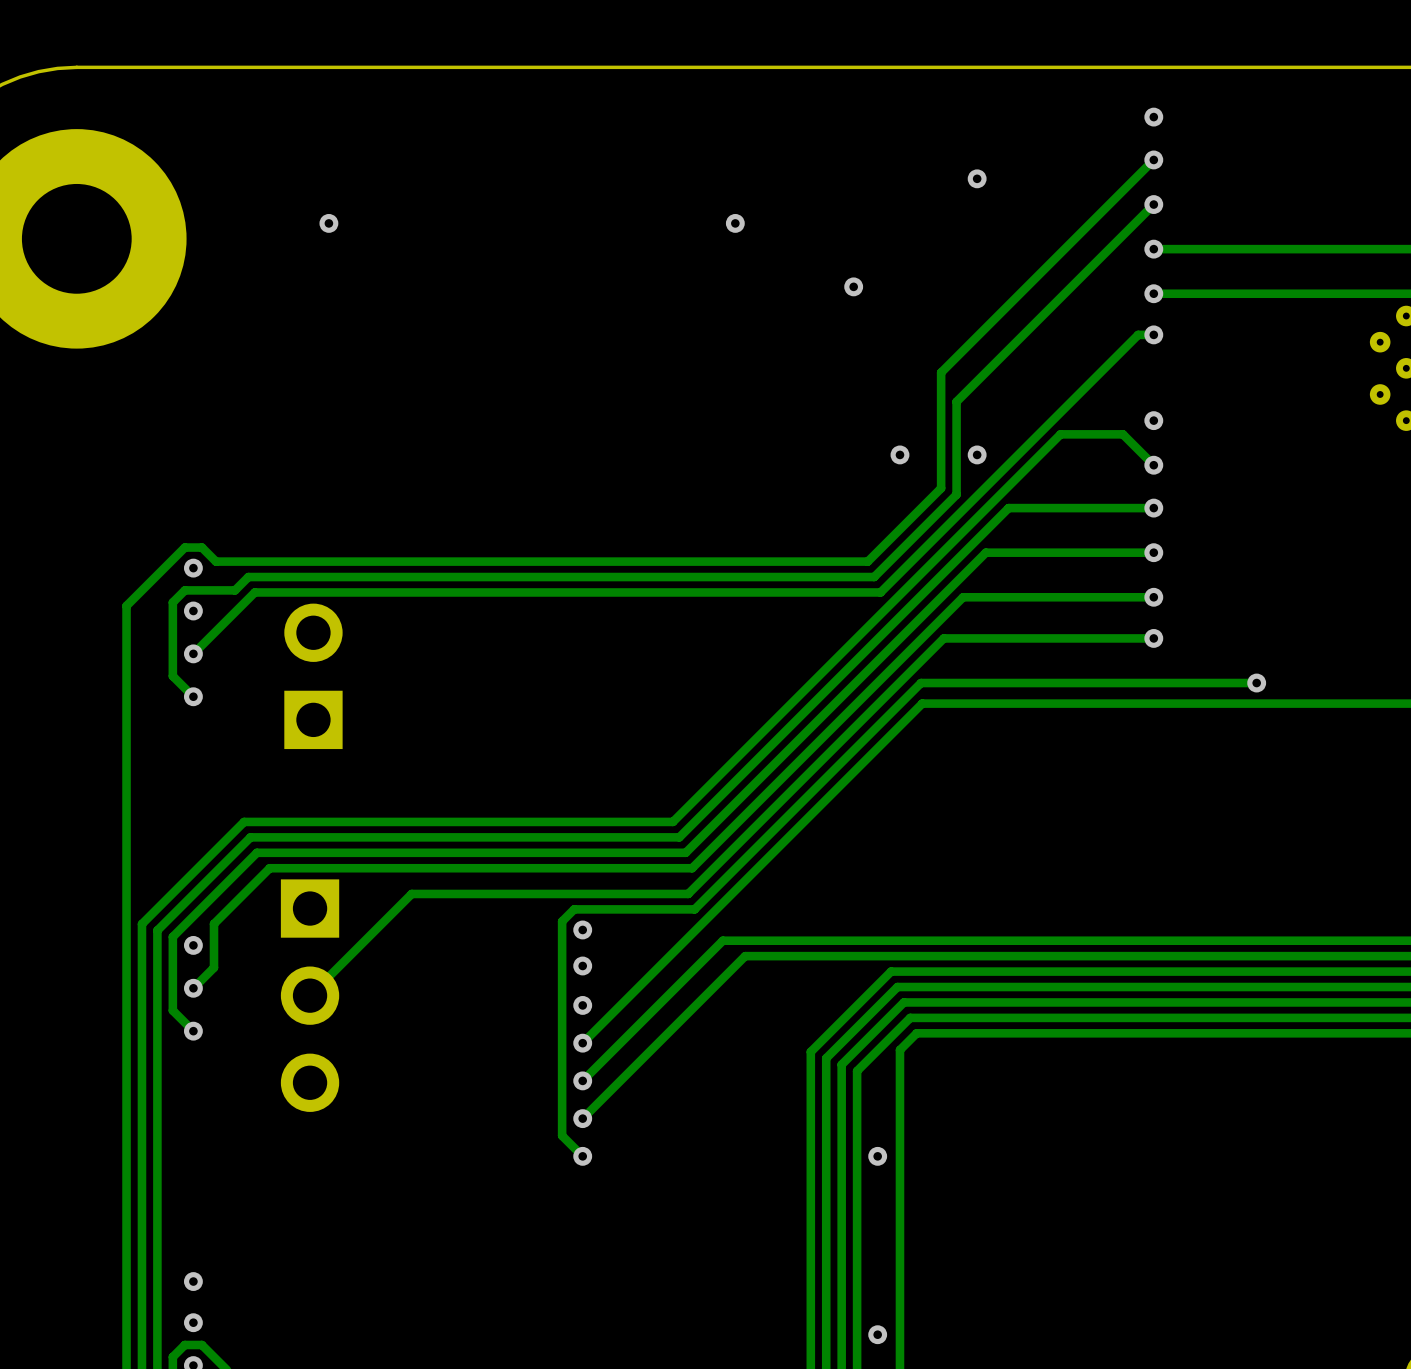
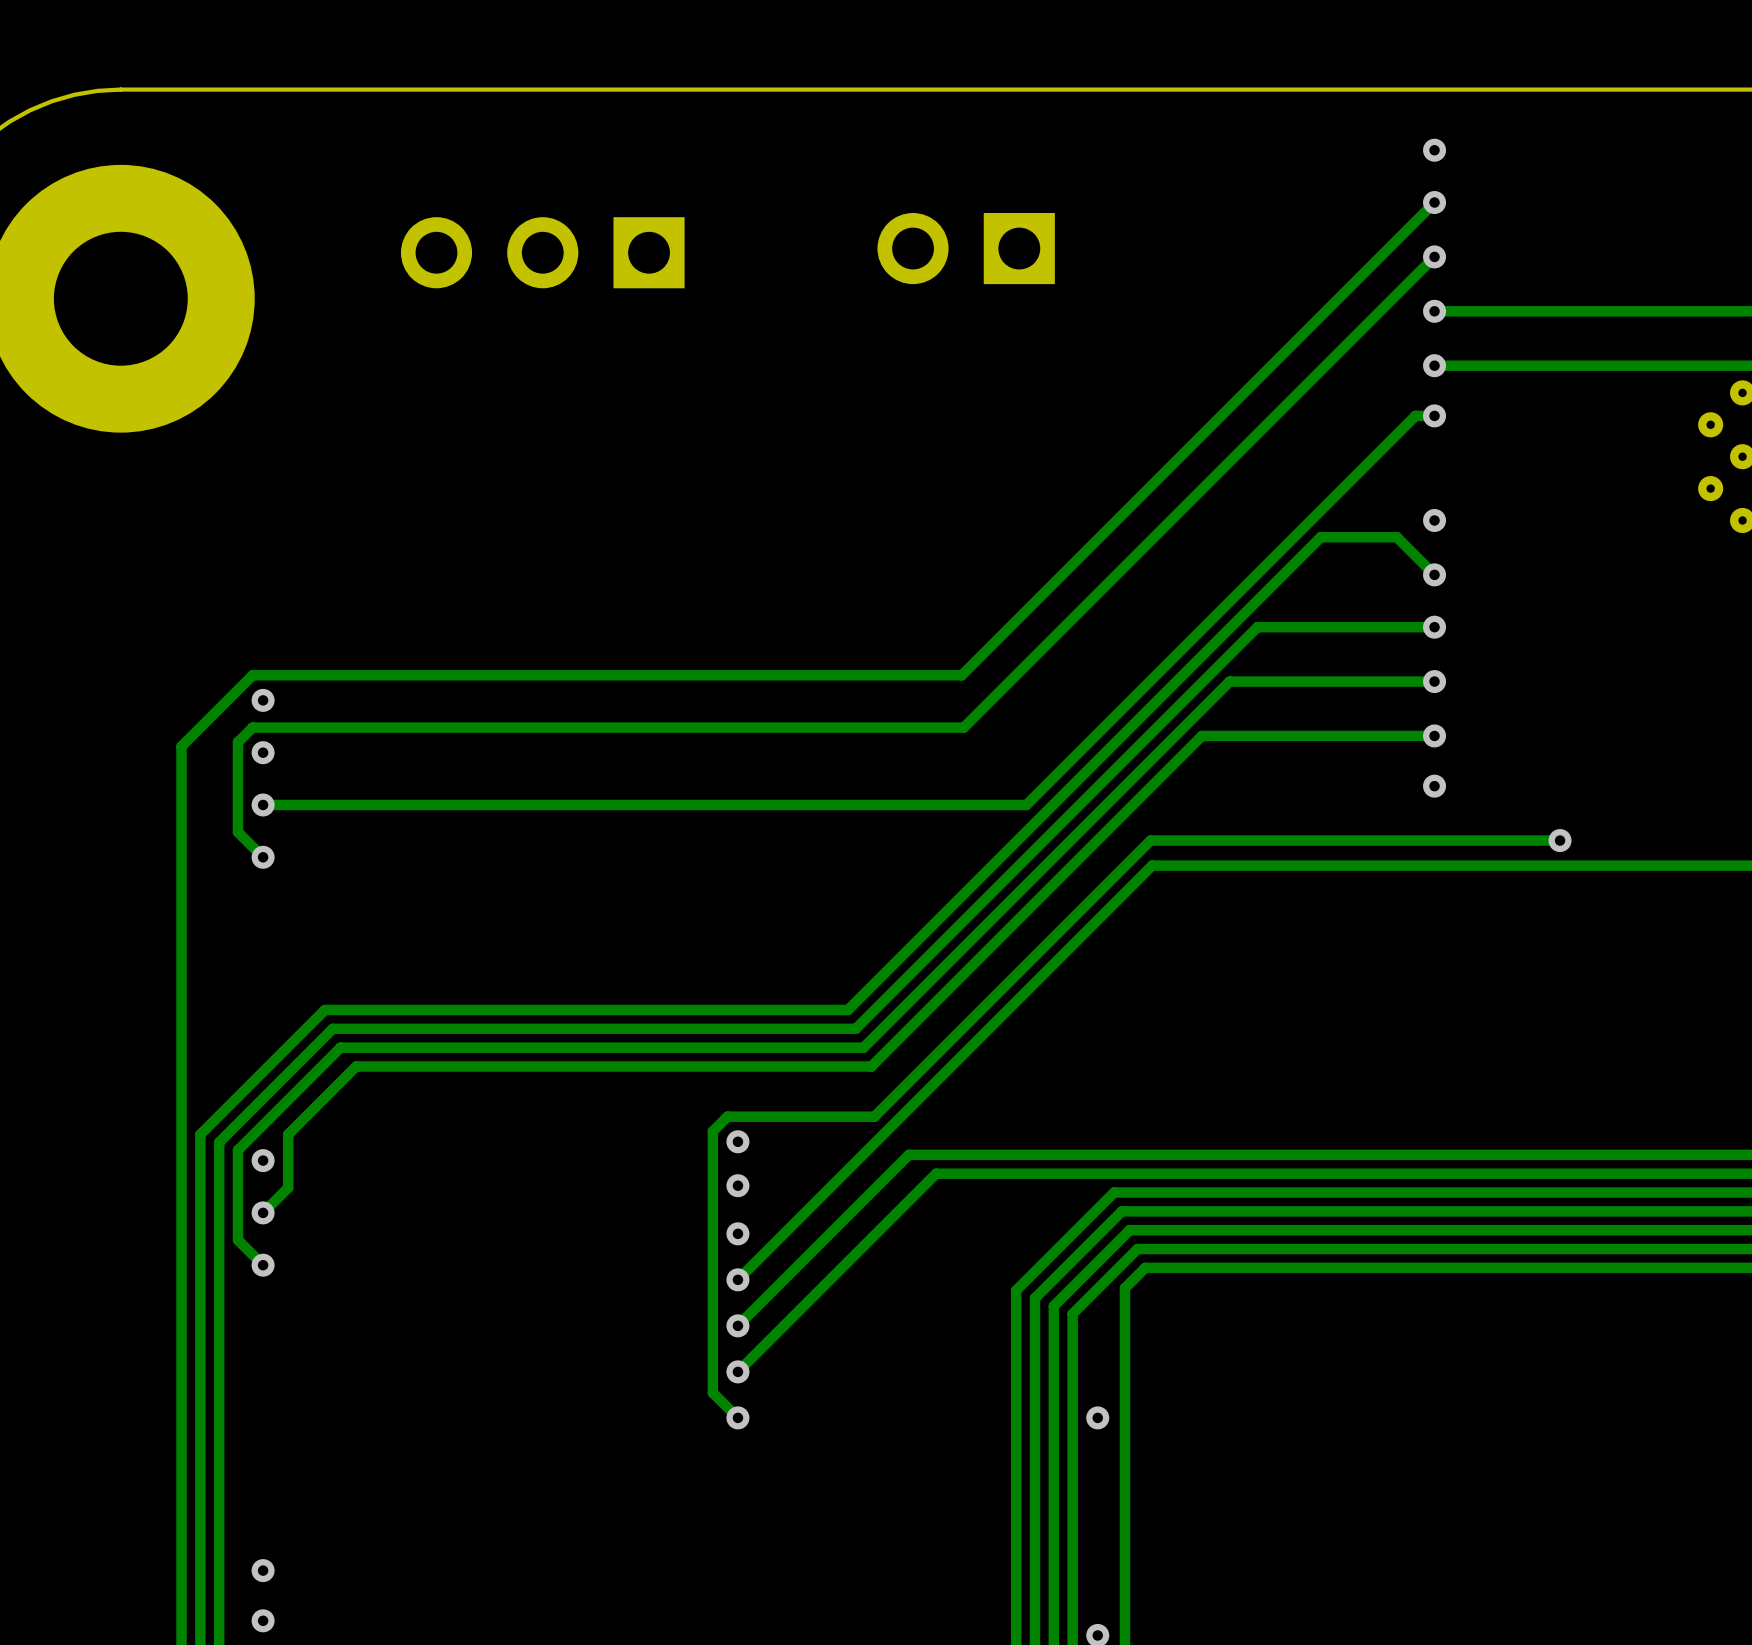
via: (977, 178) -> none
via: (328, 223) -> none
via: (735, 223) -> none
via: (853, 286) -> none
track: (941, 372) (941, 488) (867, 561) (216, 561) (201, 547) -> (1175, 461) (961, 675) (273, 675)
track: (956, 401) (956, 494) (874, 577) (248, 577) (235, 590) -> (1193, 497) (963, 727) (313, 727)
via: (899, 454) -> none
via: (977, 454) -> none
track: (880, 592) (254, 592) (193, 653) -> (1101, 730) (1026, 804) (263, 804)
track: (1153, 638) (943, 638) (688, 893) (411, 893) (310, 995) -> none
part rotation: 0° (313, 676) -> 90° counterclockwise (966, 248)
part position: (313, 676) -> (966, 248)
part rotation: 0° (310, 995) -> 90° clockwise (542, 252)
part position: (310, 995) -> (542, 252)

